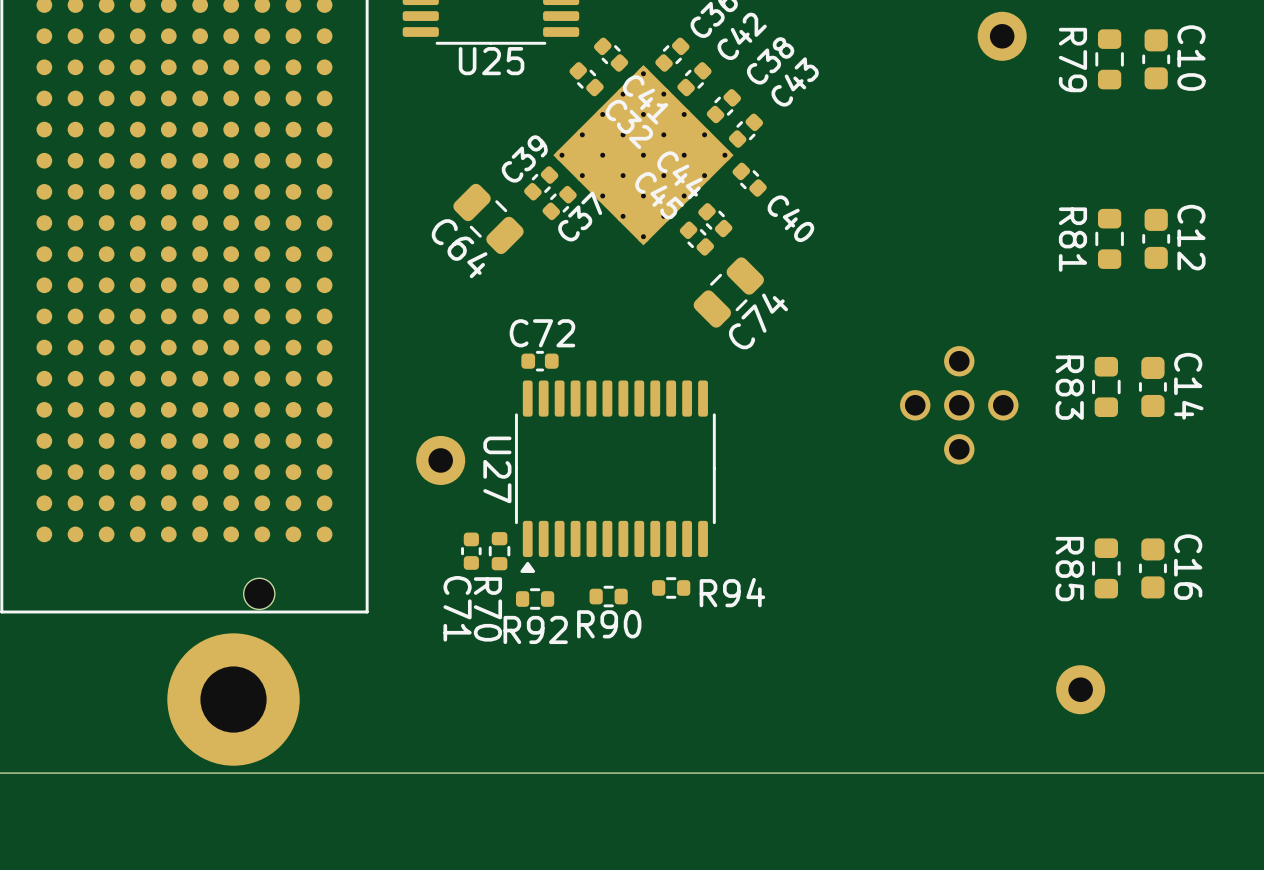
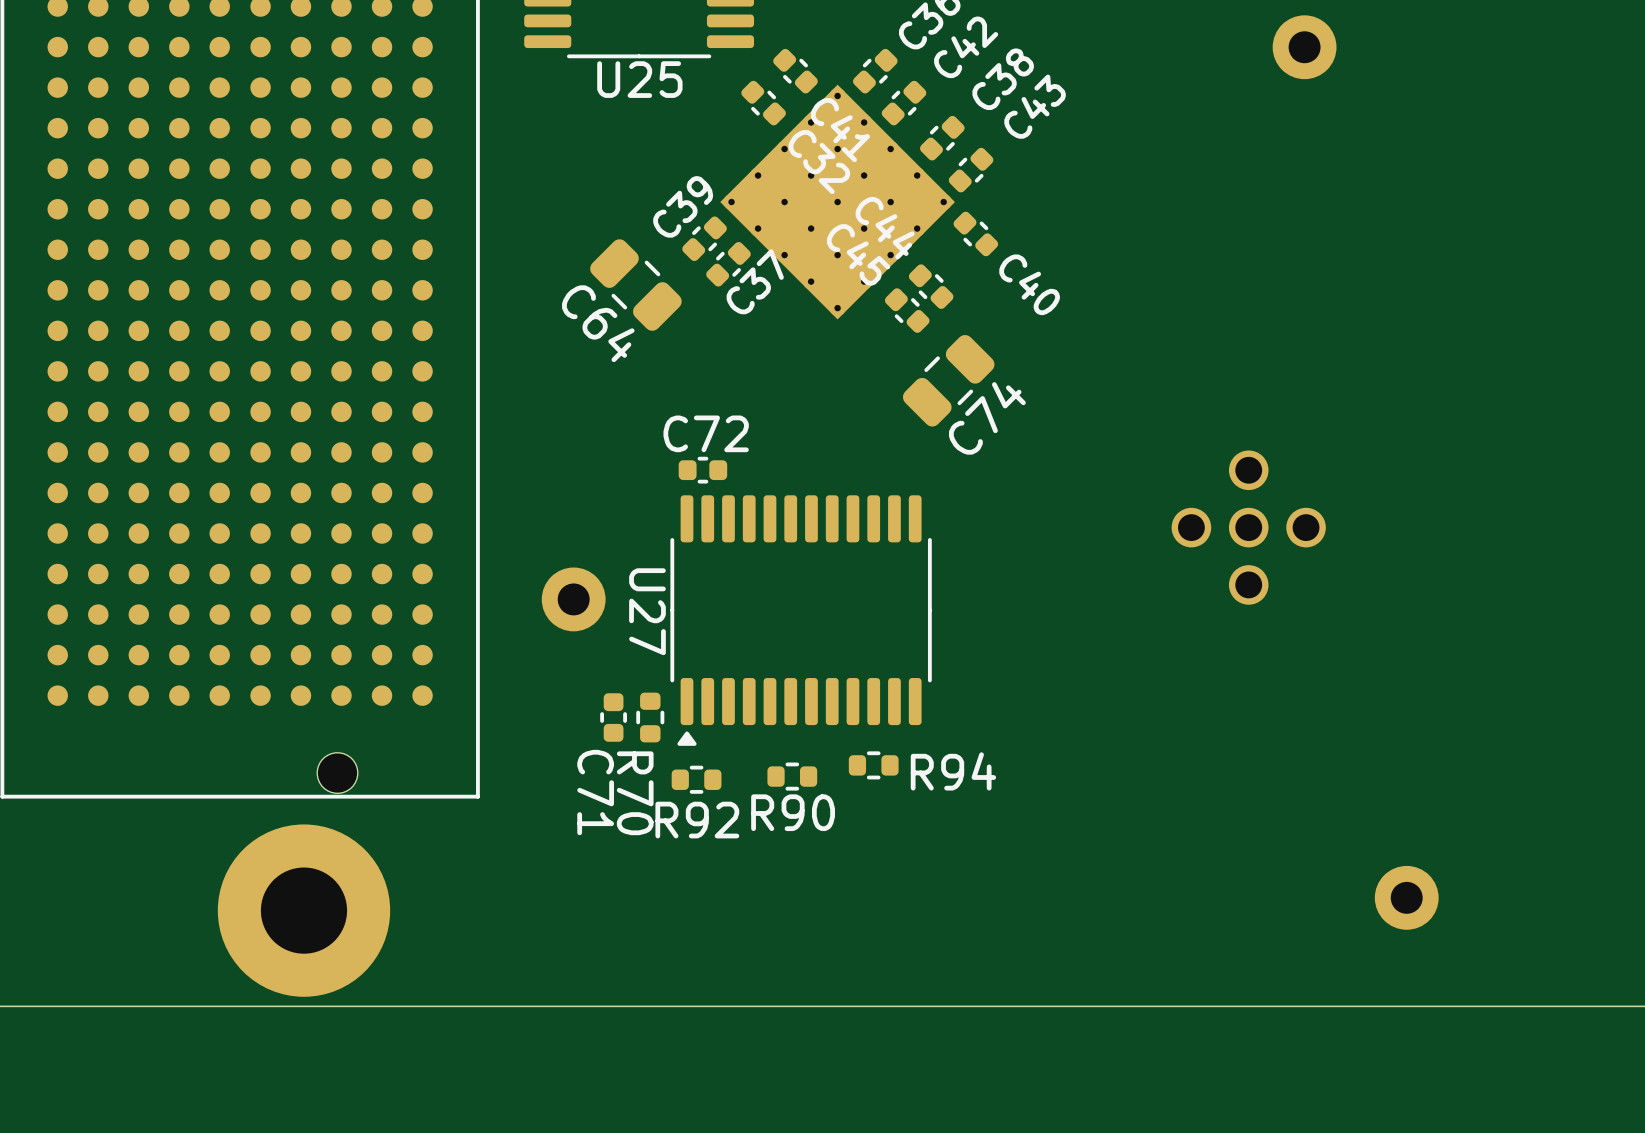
R79: (1109, 59) -> none
C10: (1156, 59) -> none
R81: (1109, 238) -> none
C12: (1156, 238) -> none
R83: (1106, 386) -> none
C14: (1152, 386) -> none
R85: (1106, 568) -> none
C16: (1152, 568) -> none

